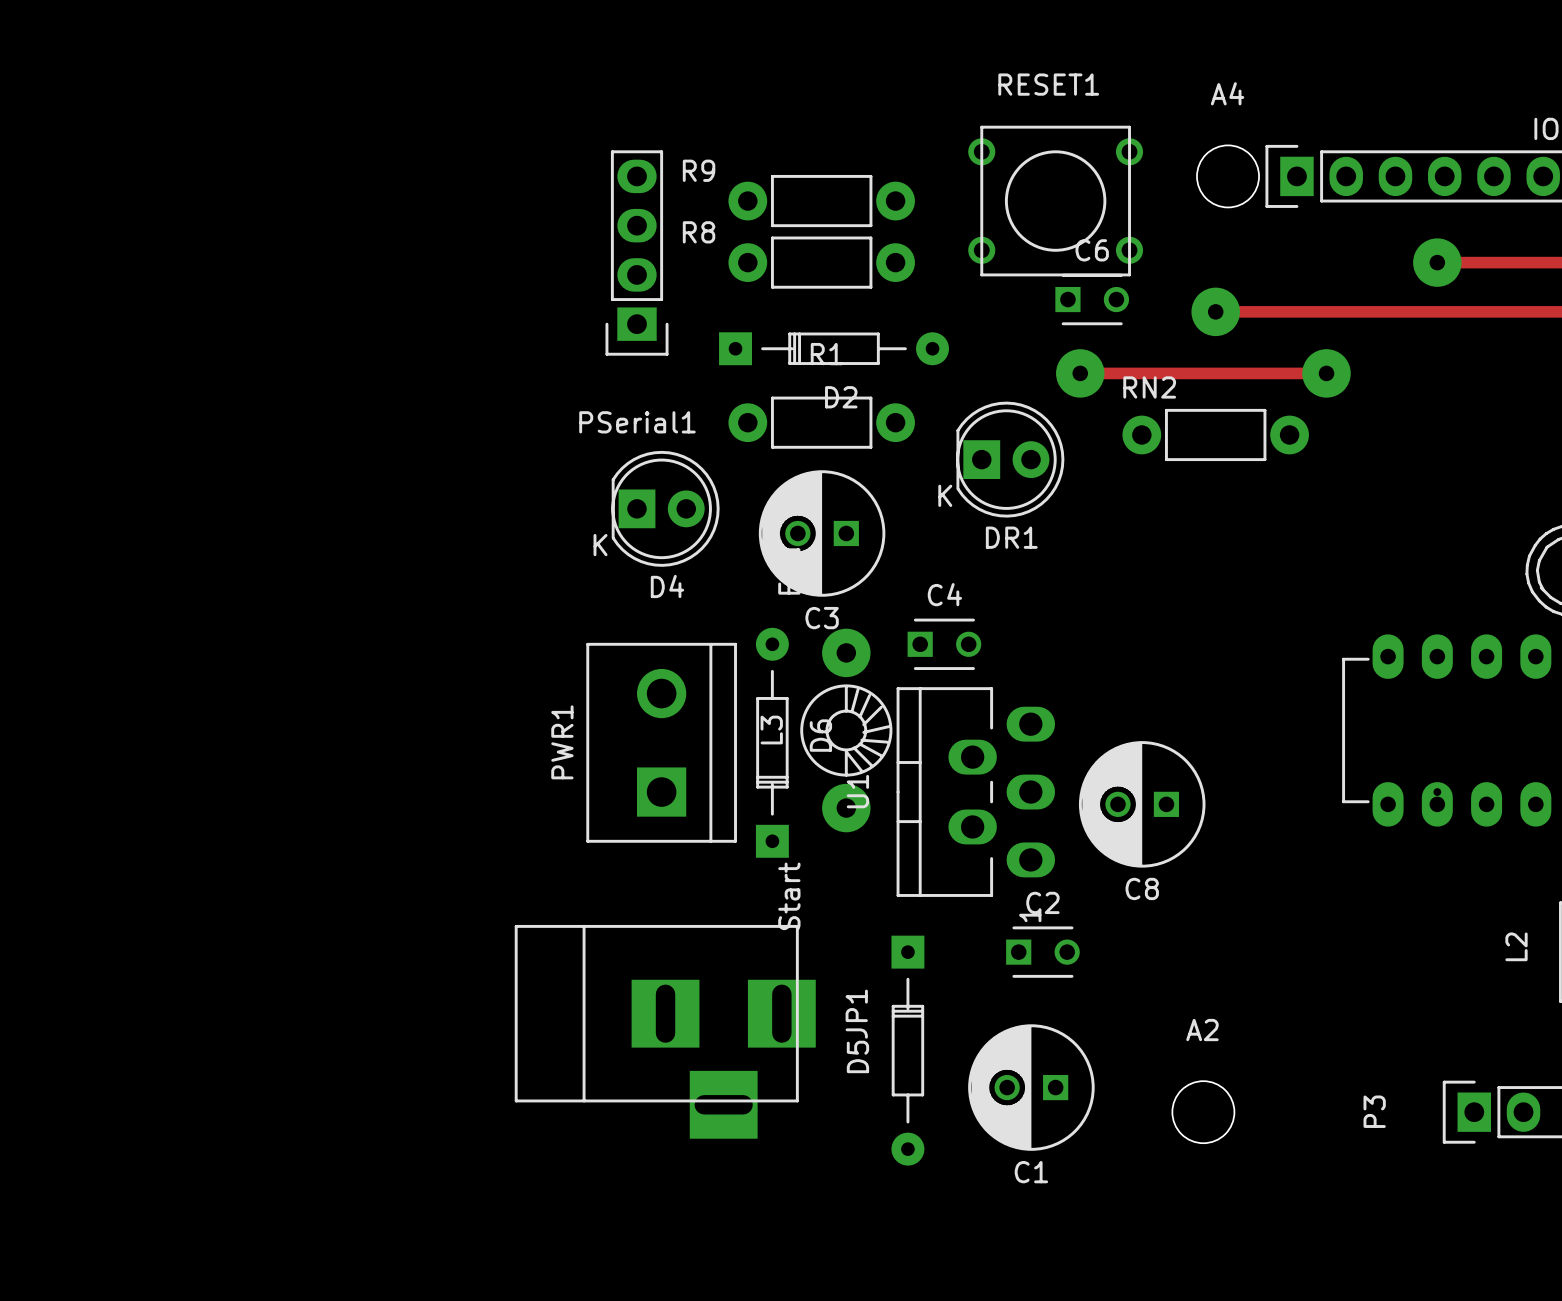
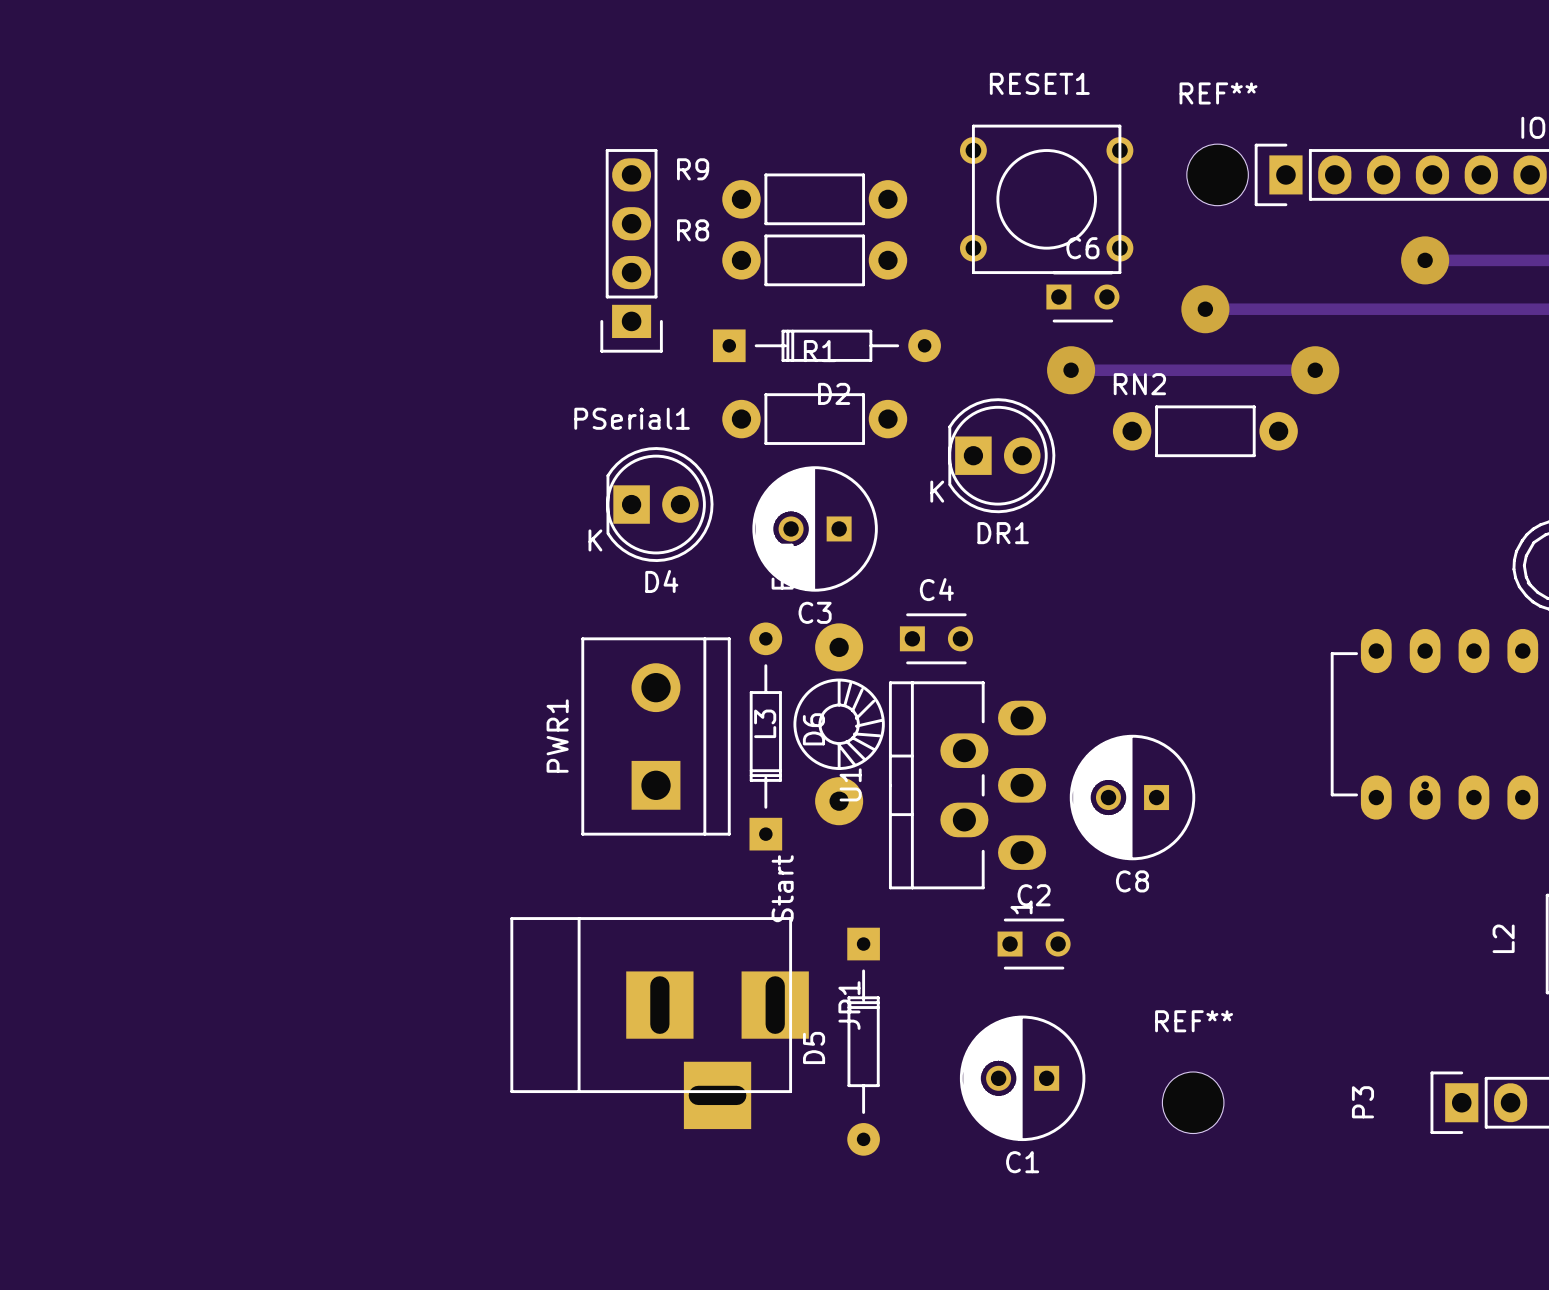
A4 name: A4 (1227, 93) -> REF** (1218, 93)
A2 name: A2 (1202, 1030) -> REF** (1194, 1021)
D5 position: (907, 1050) -> (863, 1041)

